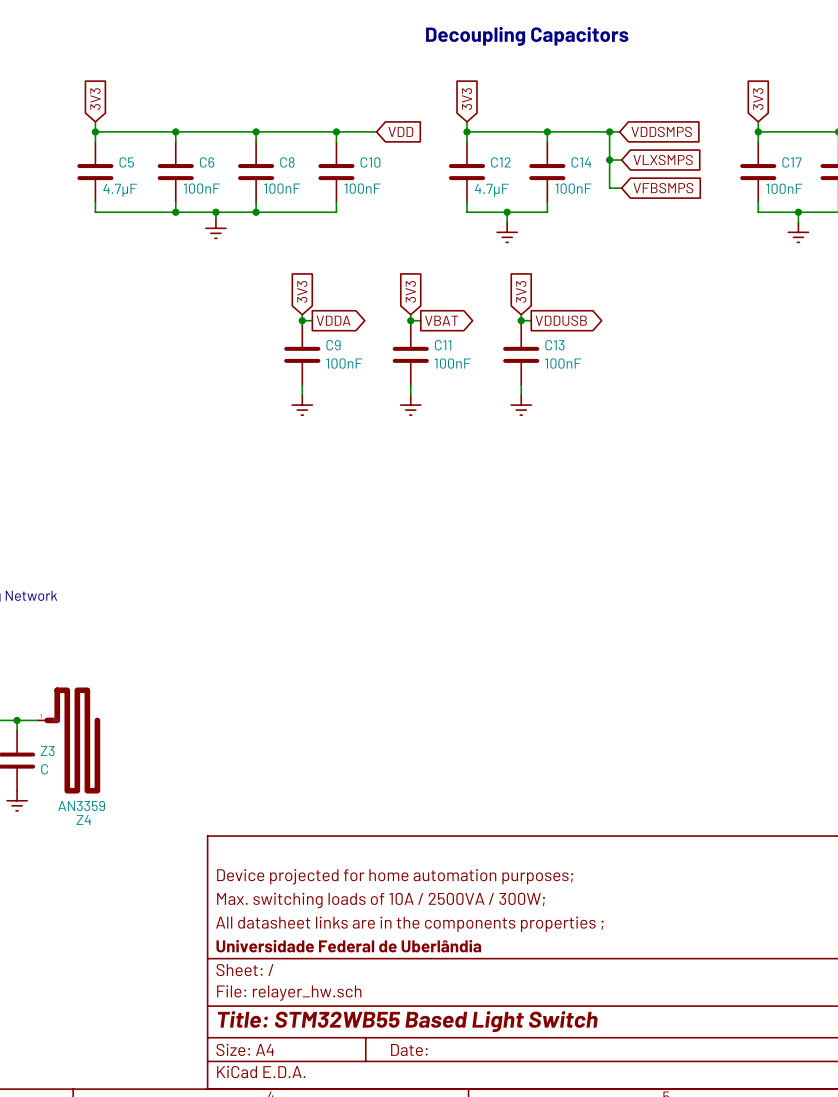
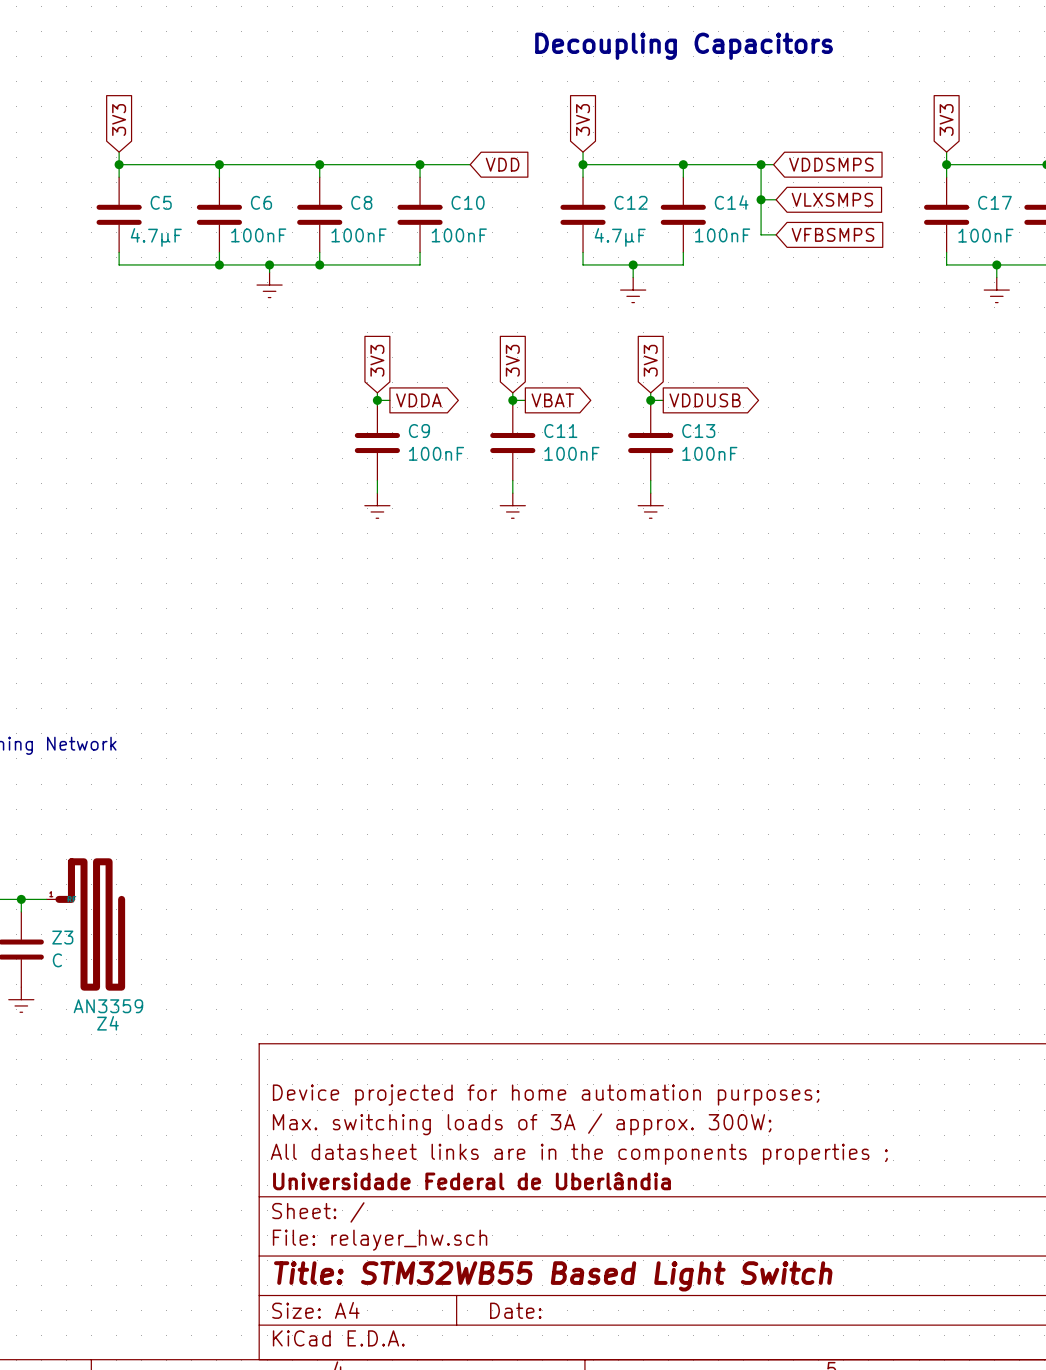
title block: Max. switching loads of 10A / 2500VA / 300W; (381, 900) -> Max. switching loads of 3A / approx. 300W; (522, 1124)

